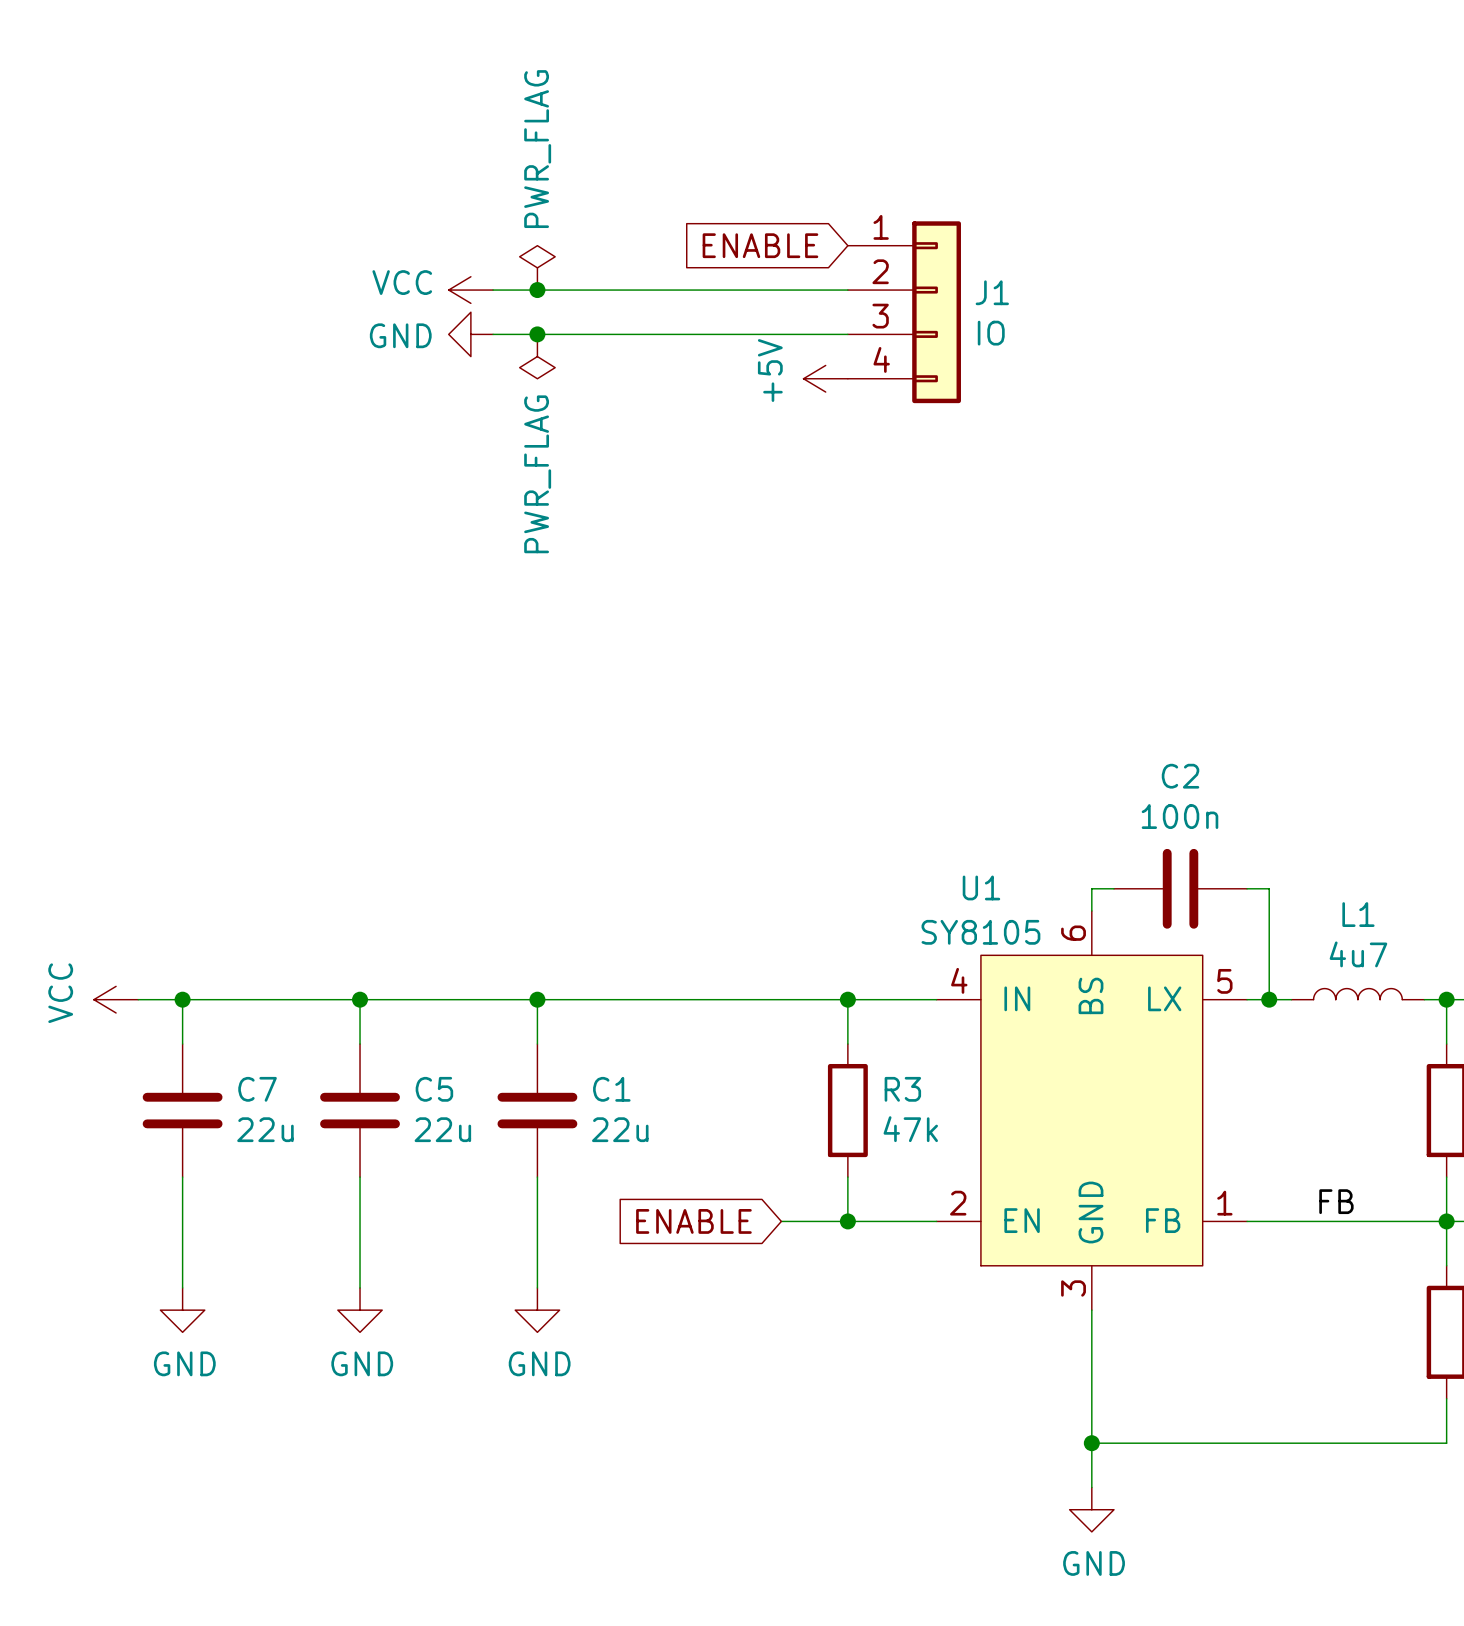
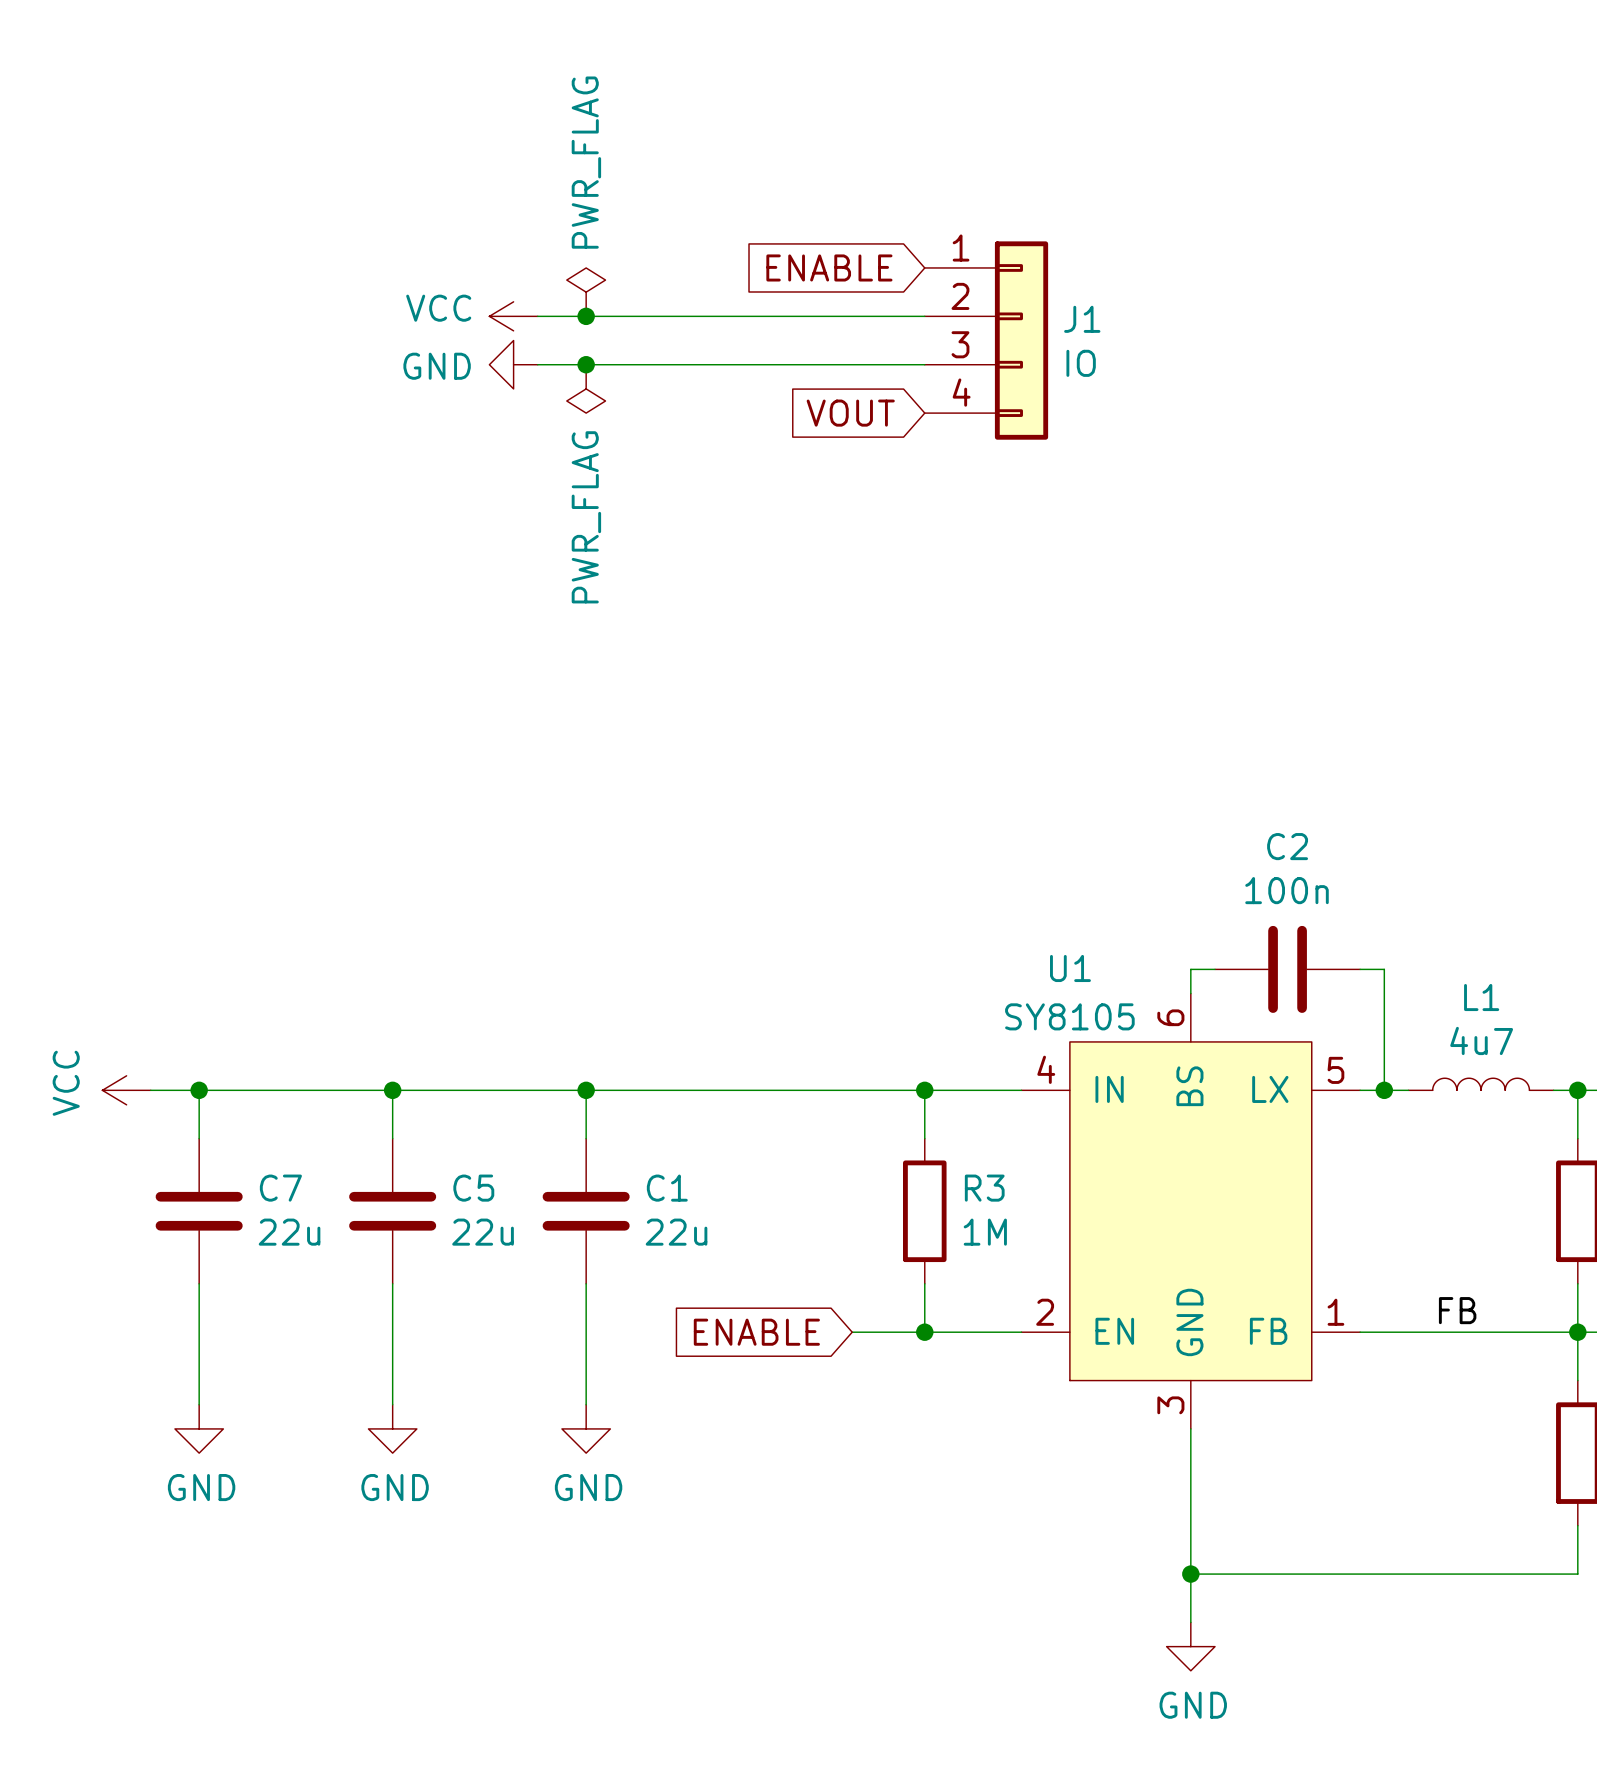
global label: none -> VOUT (850, 413)
power symbol: +5V (825, 378) -> none
R3 value: 47k (910, 1129) -> 1M (985, 1232)

